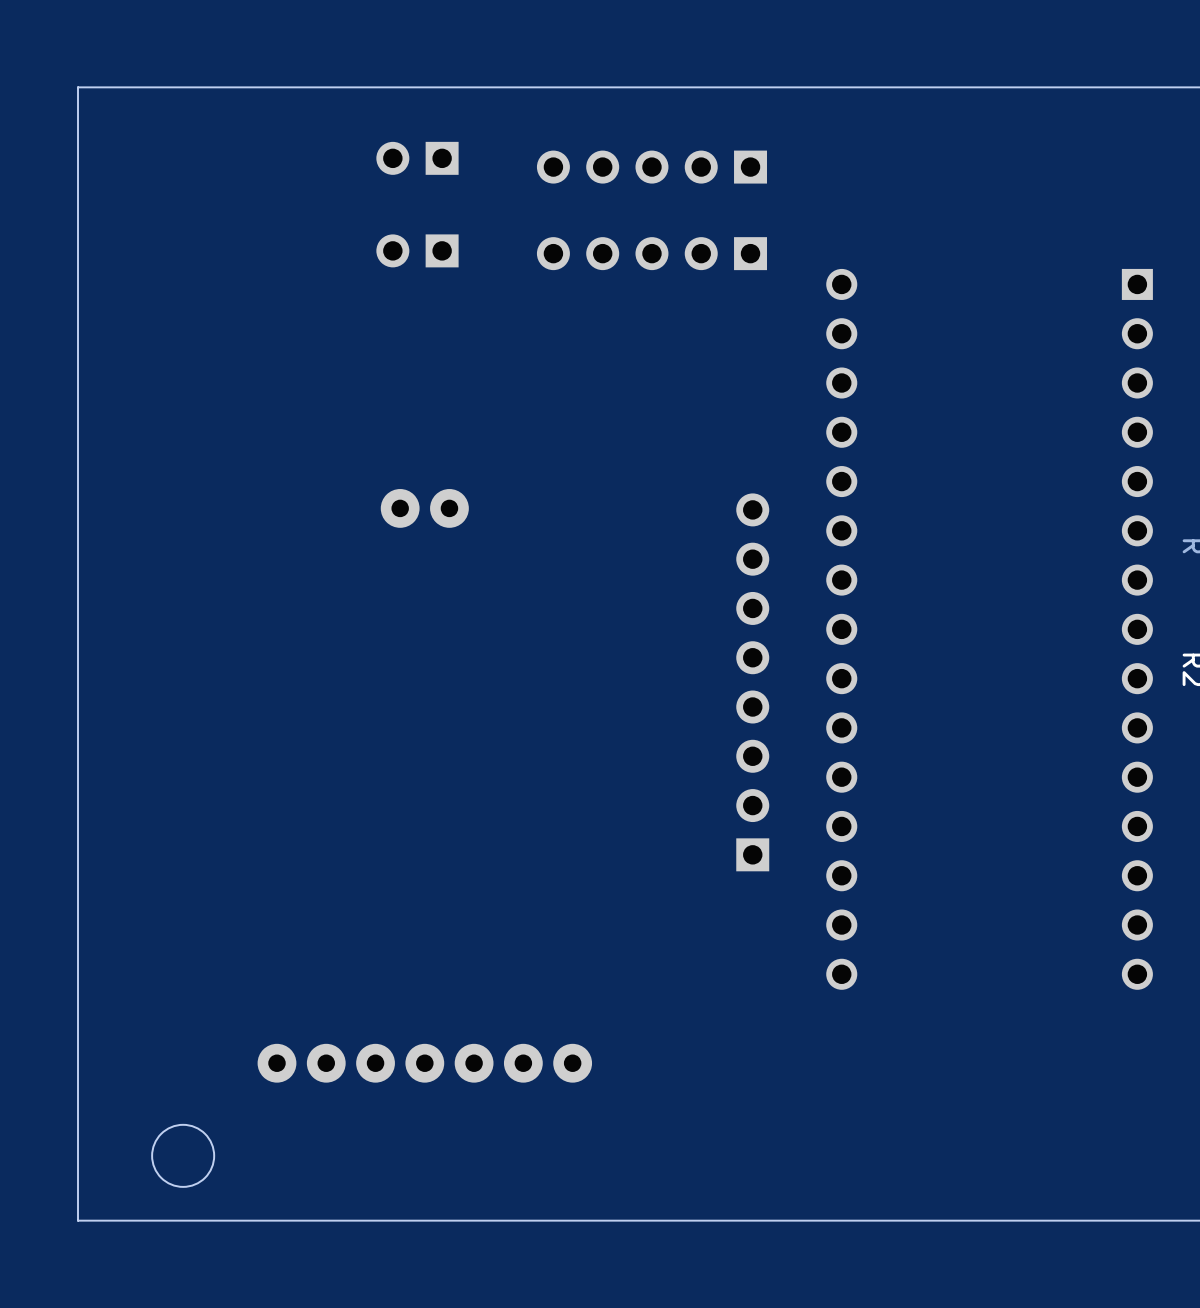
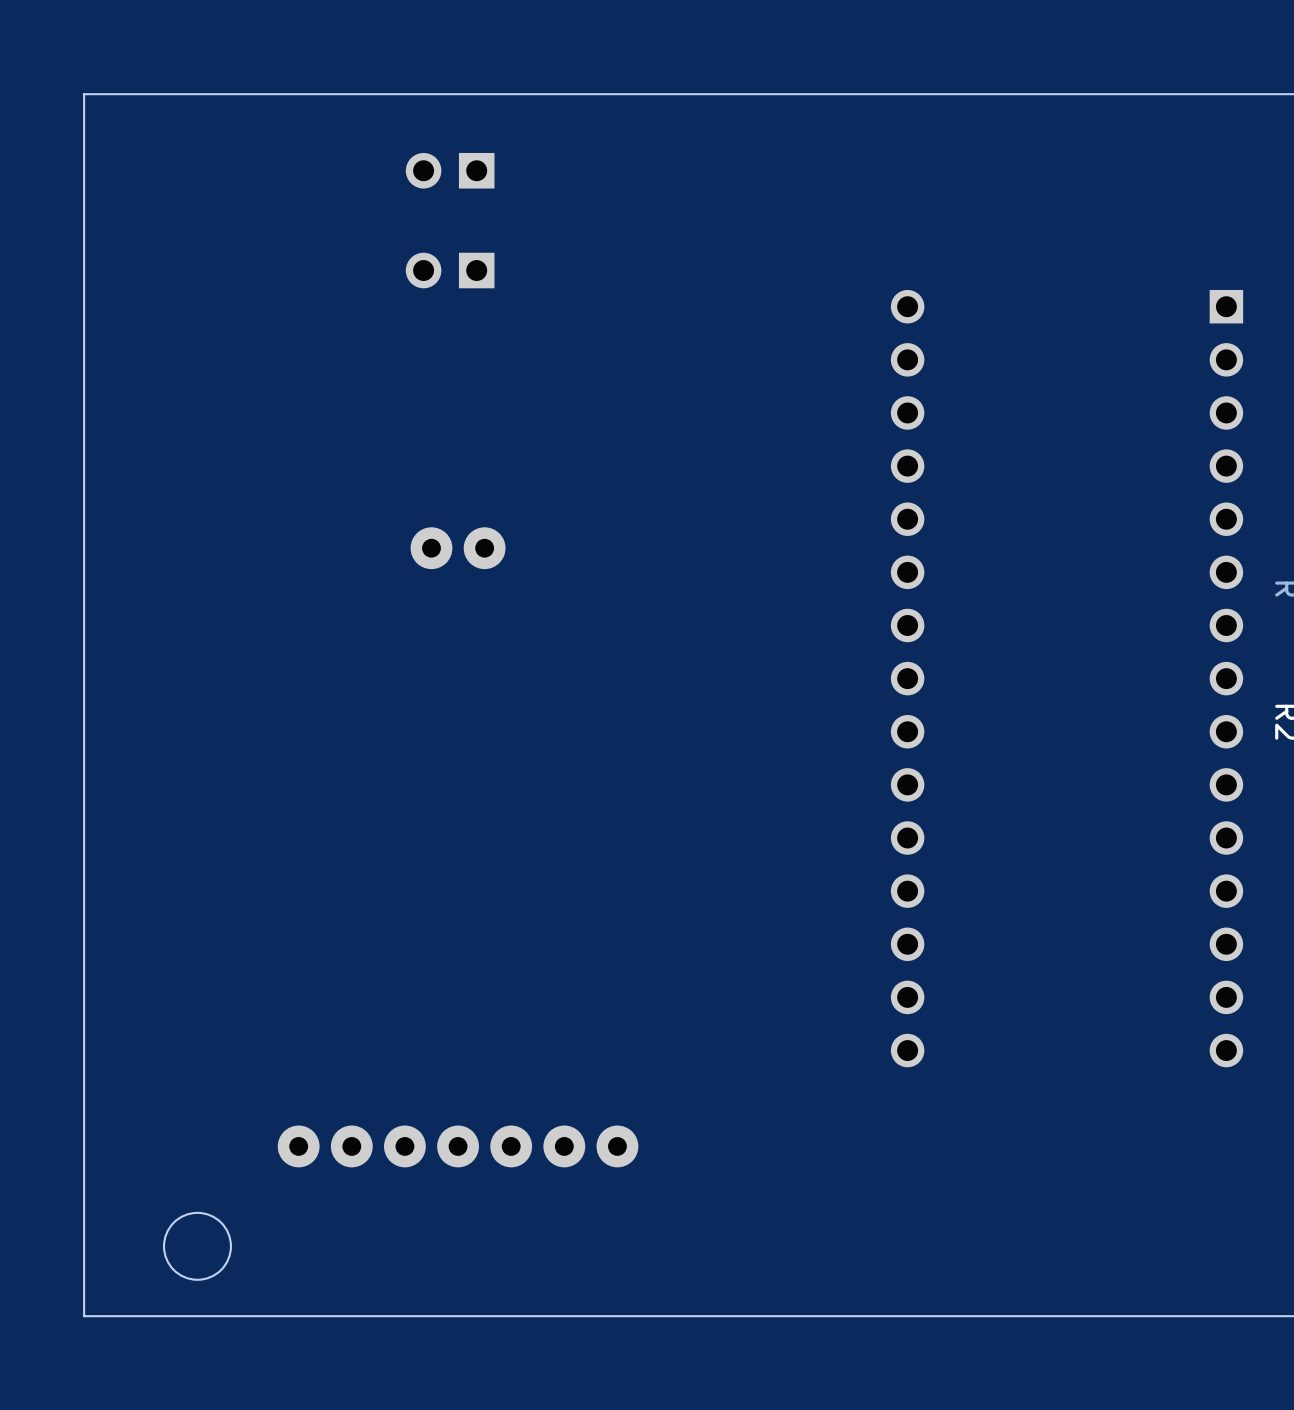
part: (651, 167) -> none
part: (651, 253) -> none
part: (752, 682) -> none

